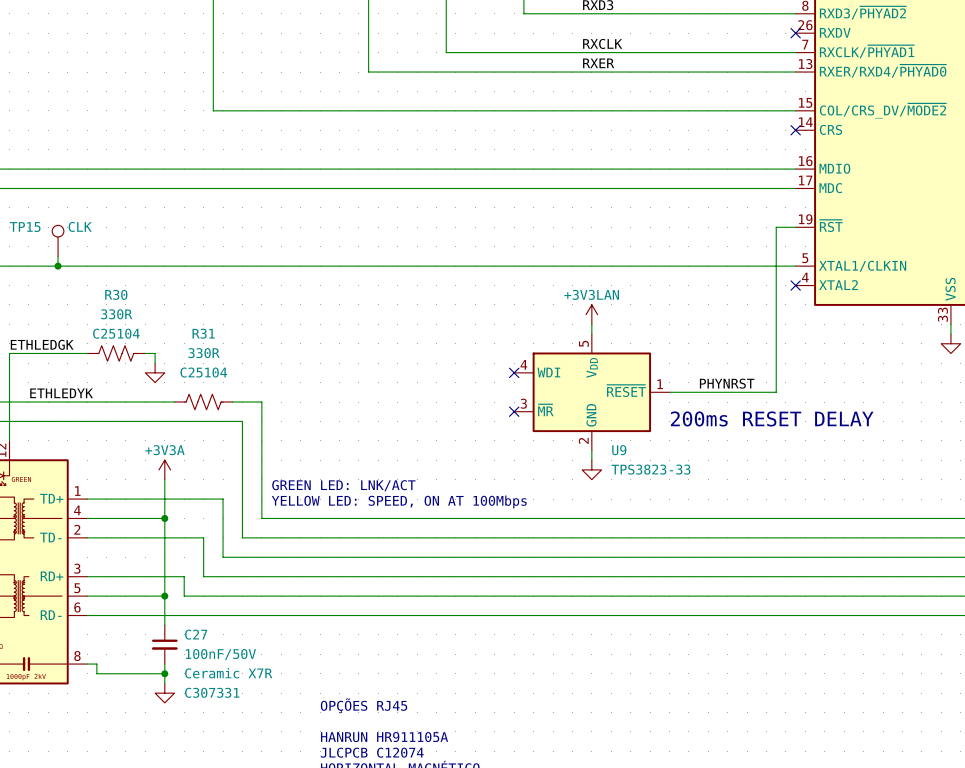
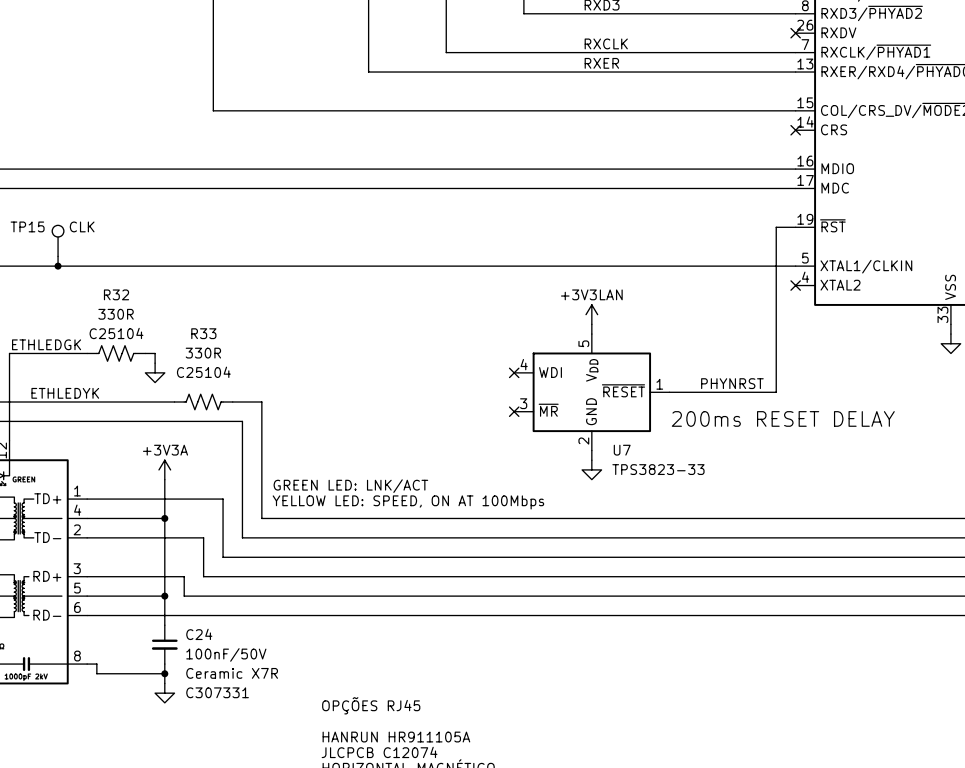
R30 name: R30 (116, 294) -> R32 (116, 294)
R31 name: R31 (203, 333) -> R33 (203, 333)
U9 name: U9 (619, 450) -> U7 (622, 450)
C27 name: C27 (196, 634) -> C24 (199, 634)

